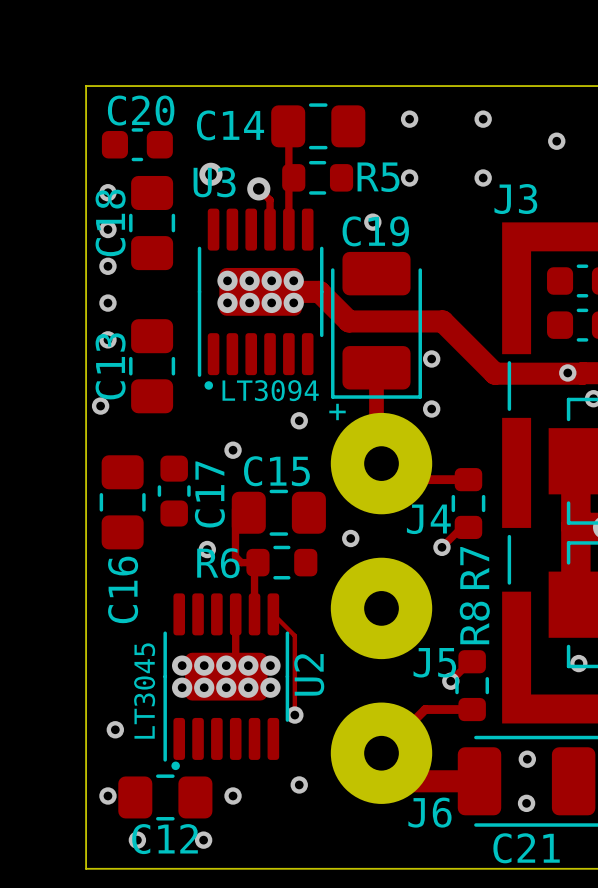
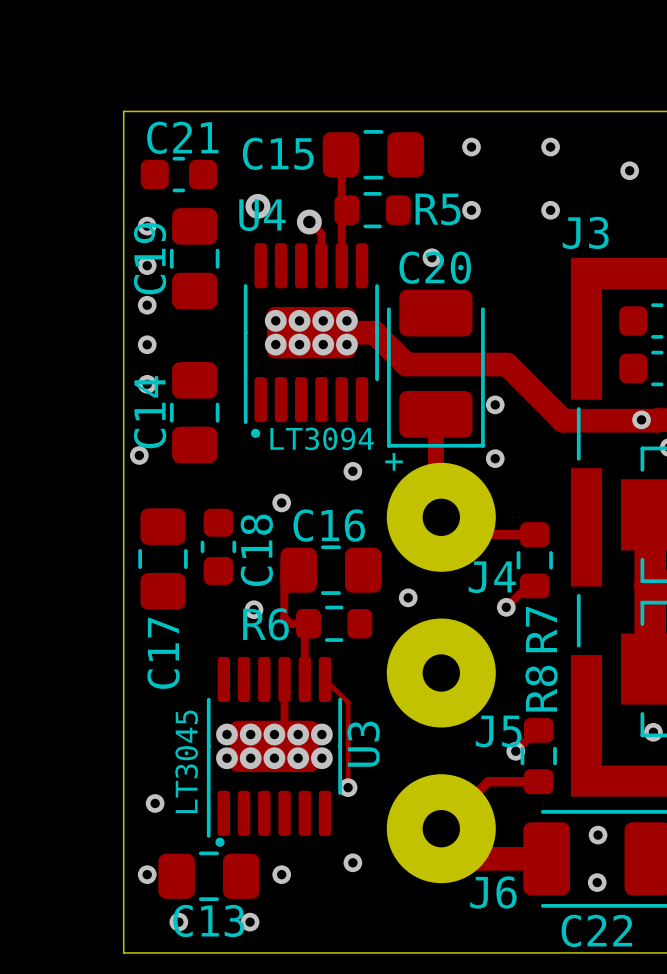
C20 name: C20 (141, 110) -> C21 (182, 137)
C14 name: C14 (230, 125) -> C15 (278, 153)
U3 name: U3 (214, 182) -> U4 (262, 215)
C18 name: C18 (110, 222) -> C19 (150, 258)
C19 name: C19 (375, 231) -> C20 (435, 267)
C13 name: C13 (110, 366) -> C14 (150, 412)
C15 name: C15 (276, 471) -> C16 (329, 525)
C17 name: C17 (209, 494) -> C18 (256, 550)
C16 name: C16 (123, 589) -> C17 (163, 653)
U2 name: U2 (309, 674) -> U3 (363, 744)
C12 name: C12 (165, 839) -> C13 (208, 920)
C21 name: C21 (526, 848) -> C22 (596, 930)

